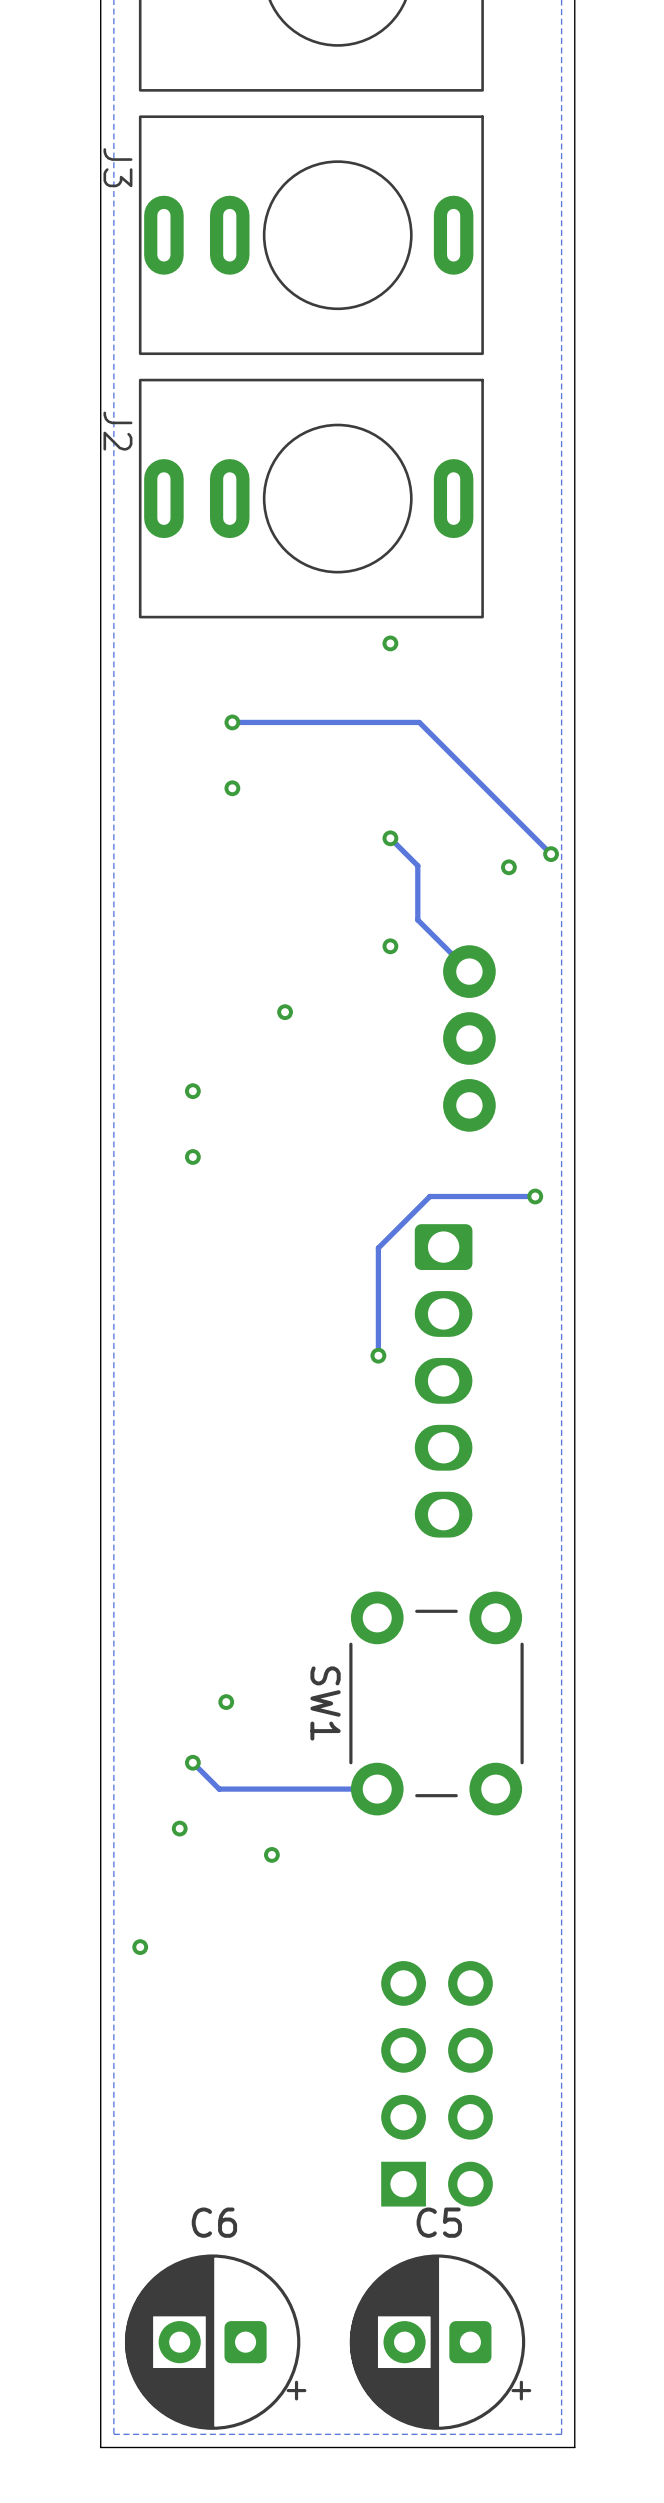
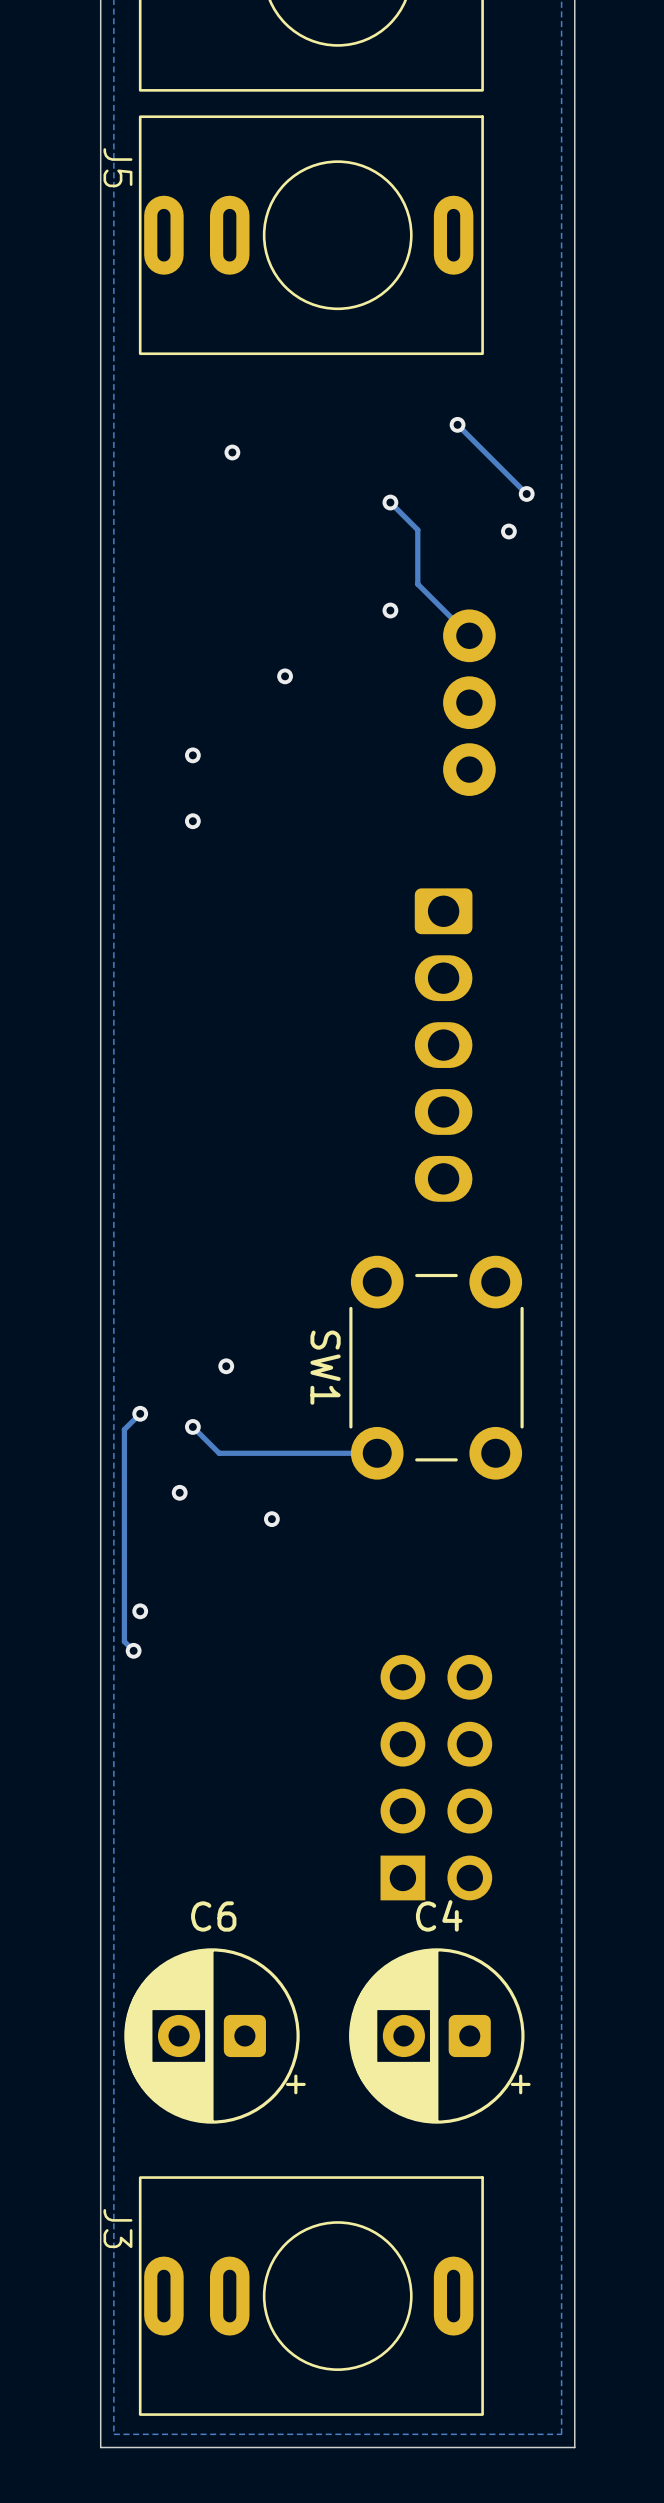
J3 name: J3 (117, 167) -> J5 (117, 167)
track: none -> (457, 424) (526, 493)
via: none -> (457, 424)
via: none -> (232, 452)
via: none -> (526, 493)
J2: (311, 498) -> none
via: none -> (390, 502)
via: none -> (508, 531)
via position: (390, 643) -> (390, 610)
via: none -> (285, 676)
track: (232, 722) (419, 722) (551, 854) -> none
via: (232, 722) -> none
via: none -> (192, 755)
via: (232, 788) -> none
via: none -> (192, 821)
track: (390, 838) (417, 865) (417, 919) (469, 971) -> (390, 502) (417, 529) (417, 584) (469, 635)
via: (390, 838) -> none
via: (551, 854) -> none
via: (508, 867) -> none
via: (390, 946) -> none
via: (285, 1012) -> none
part position: (469, 1038) -> (469, 702)
via: (192, 1091) -> none
via: (192, 1157) -> none
track: (535, 1196) (429, 1196) (378, 1248) (378, 1355) -> none
via: (535, 1196) -> none
via: (378, 1355) -> none
via: none -> (226, 1366)
part position: (443, 1380) -> (443, 1045)
track: none -> (140, 1413) (124, 1429) (124, 1641) (133, 1650)
via: none -> (140, 1413)
via: none -> (192, 1426)
via: none -> (179, 1492)
via: none -> (271, 1519)
via: none -> (140, 1611)
via: none -> (133, 1650)
via: (226, 1702) -> none
SW1 position: (436, 1703) -> (436, 1367)
track: (192, 1762) (219, 1789) (377, 1789) -> (192, 1426) (219, 1453) (377, 1453)
via: (192, 1762) -> none
via: (179, 1828) -> none
via: (271, 1854) -> none
via: (140, 1947) -> none
C4: none -> (439, 2035)
part position: (437, 2083) -> (436, 1777)
J3: none -> (311, 2296)
C6 position: (215, 2342) -> (215, 2035)
C5: (440, 2342) -> none

